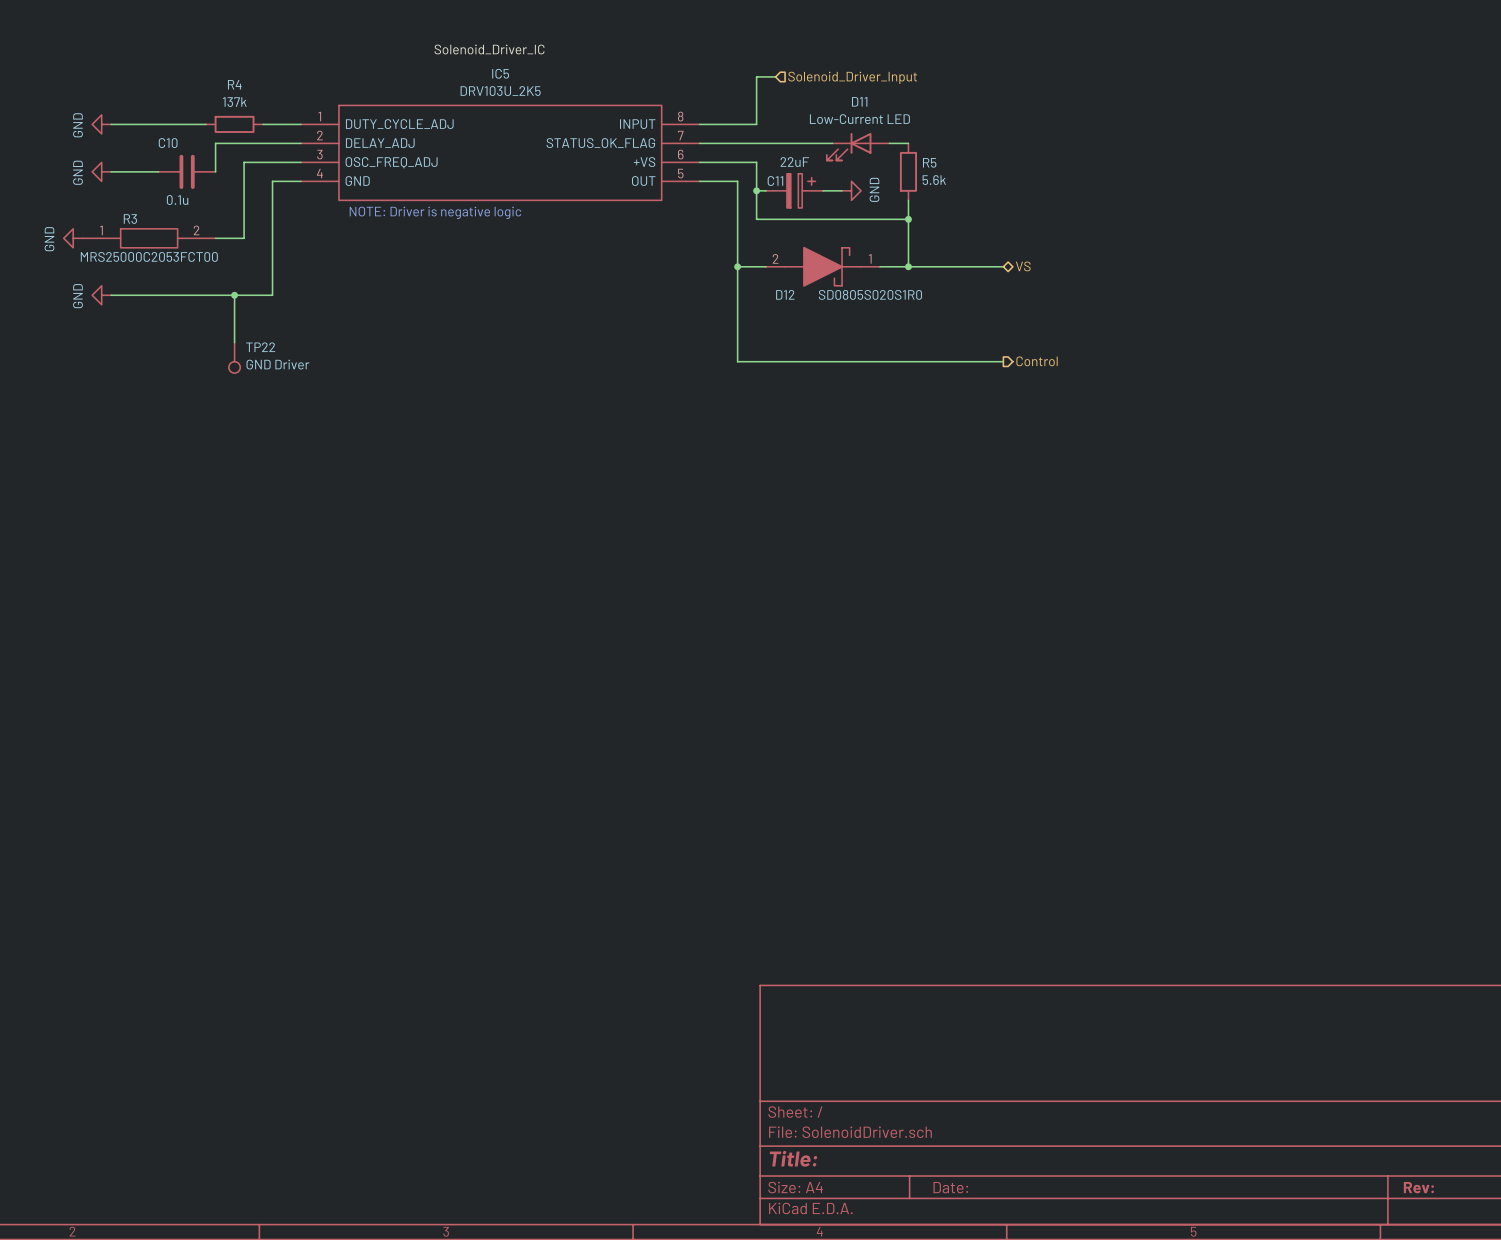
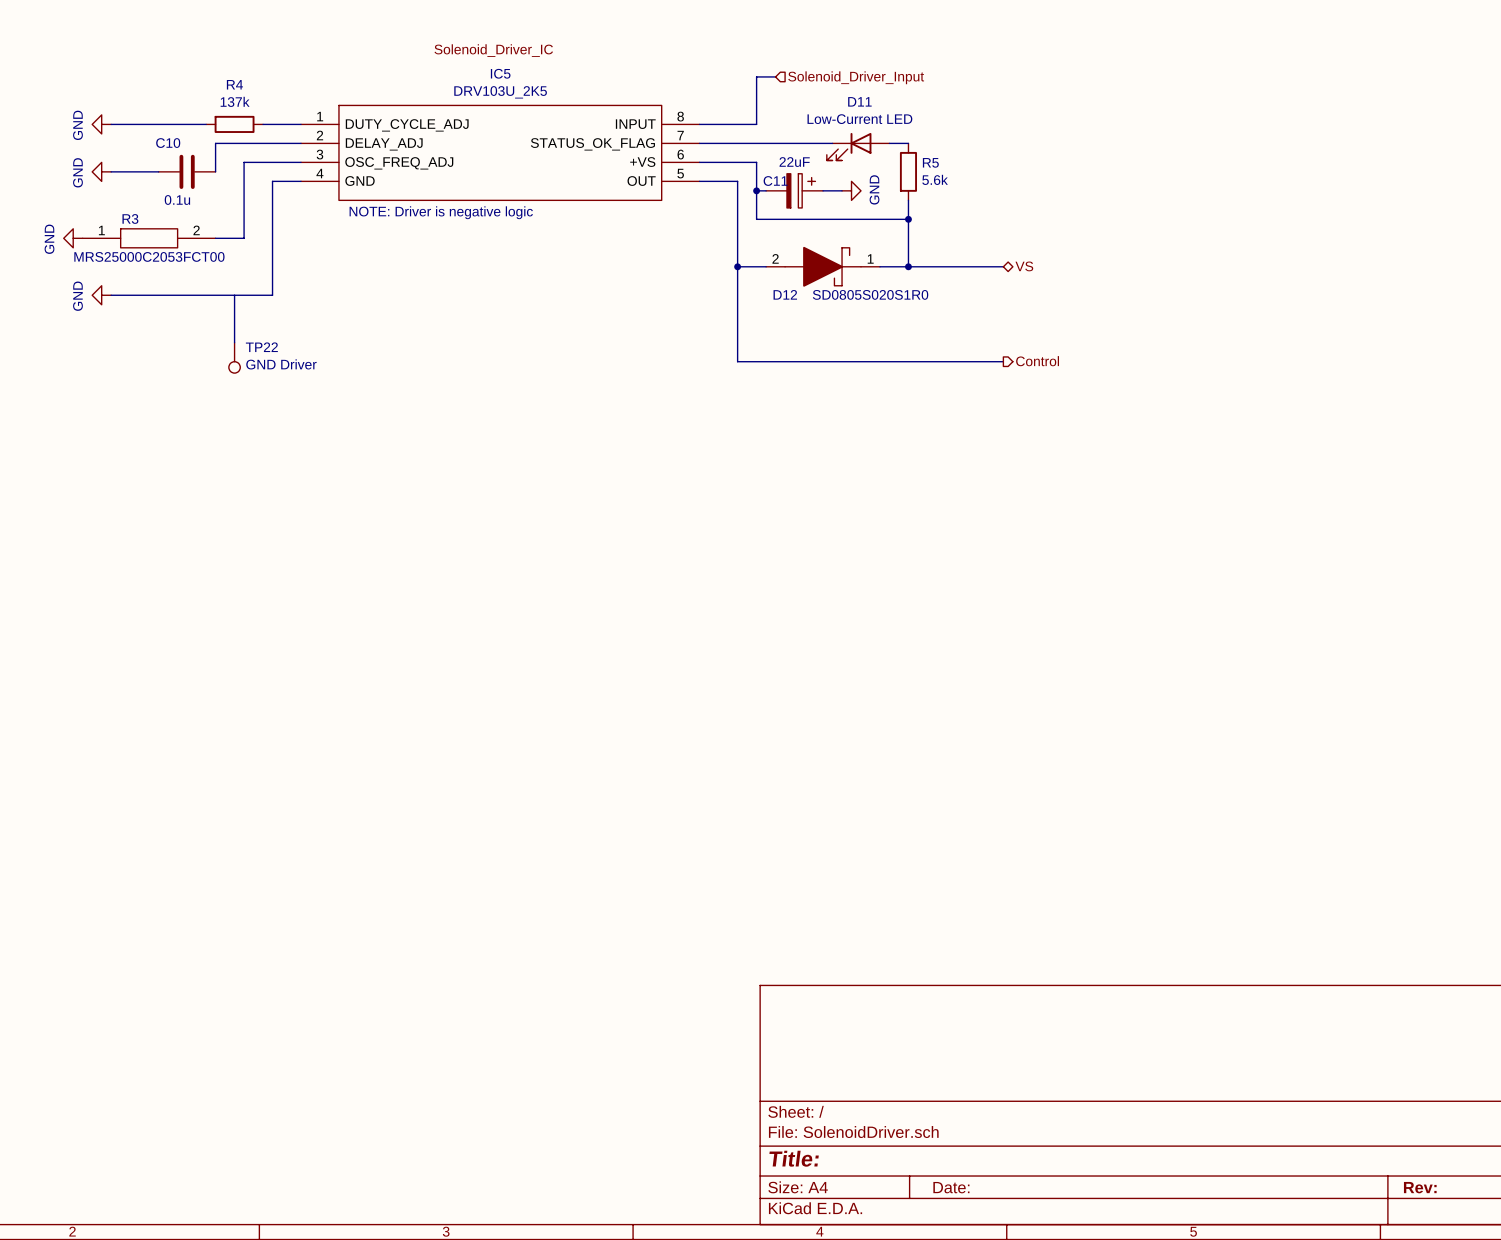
junction: (234, 295) -> none

